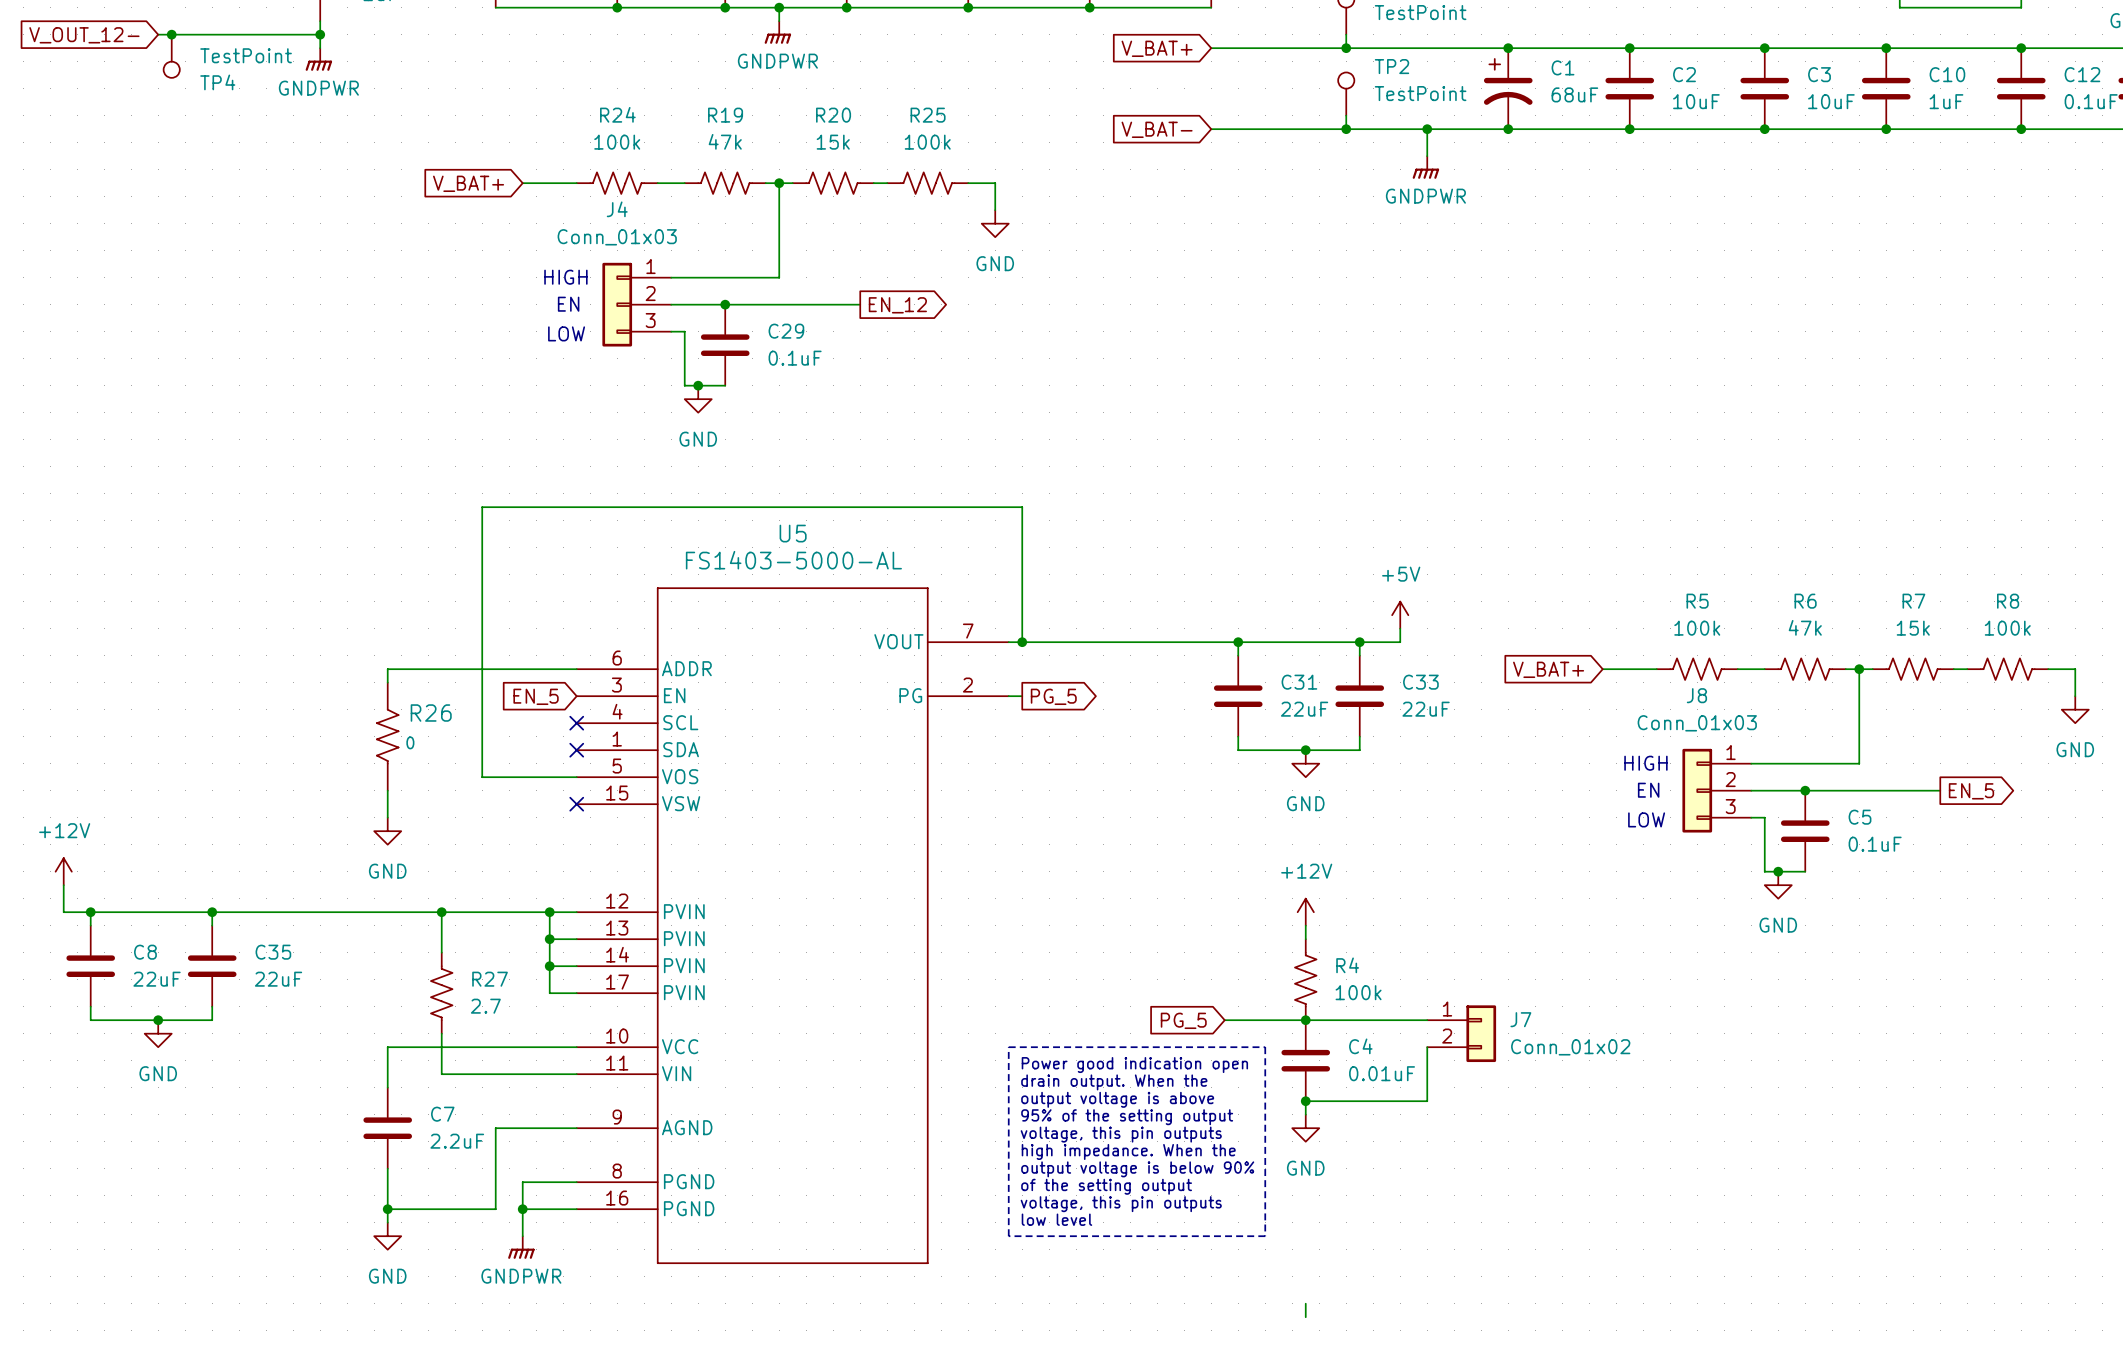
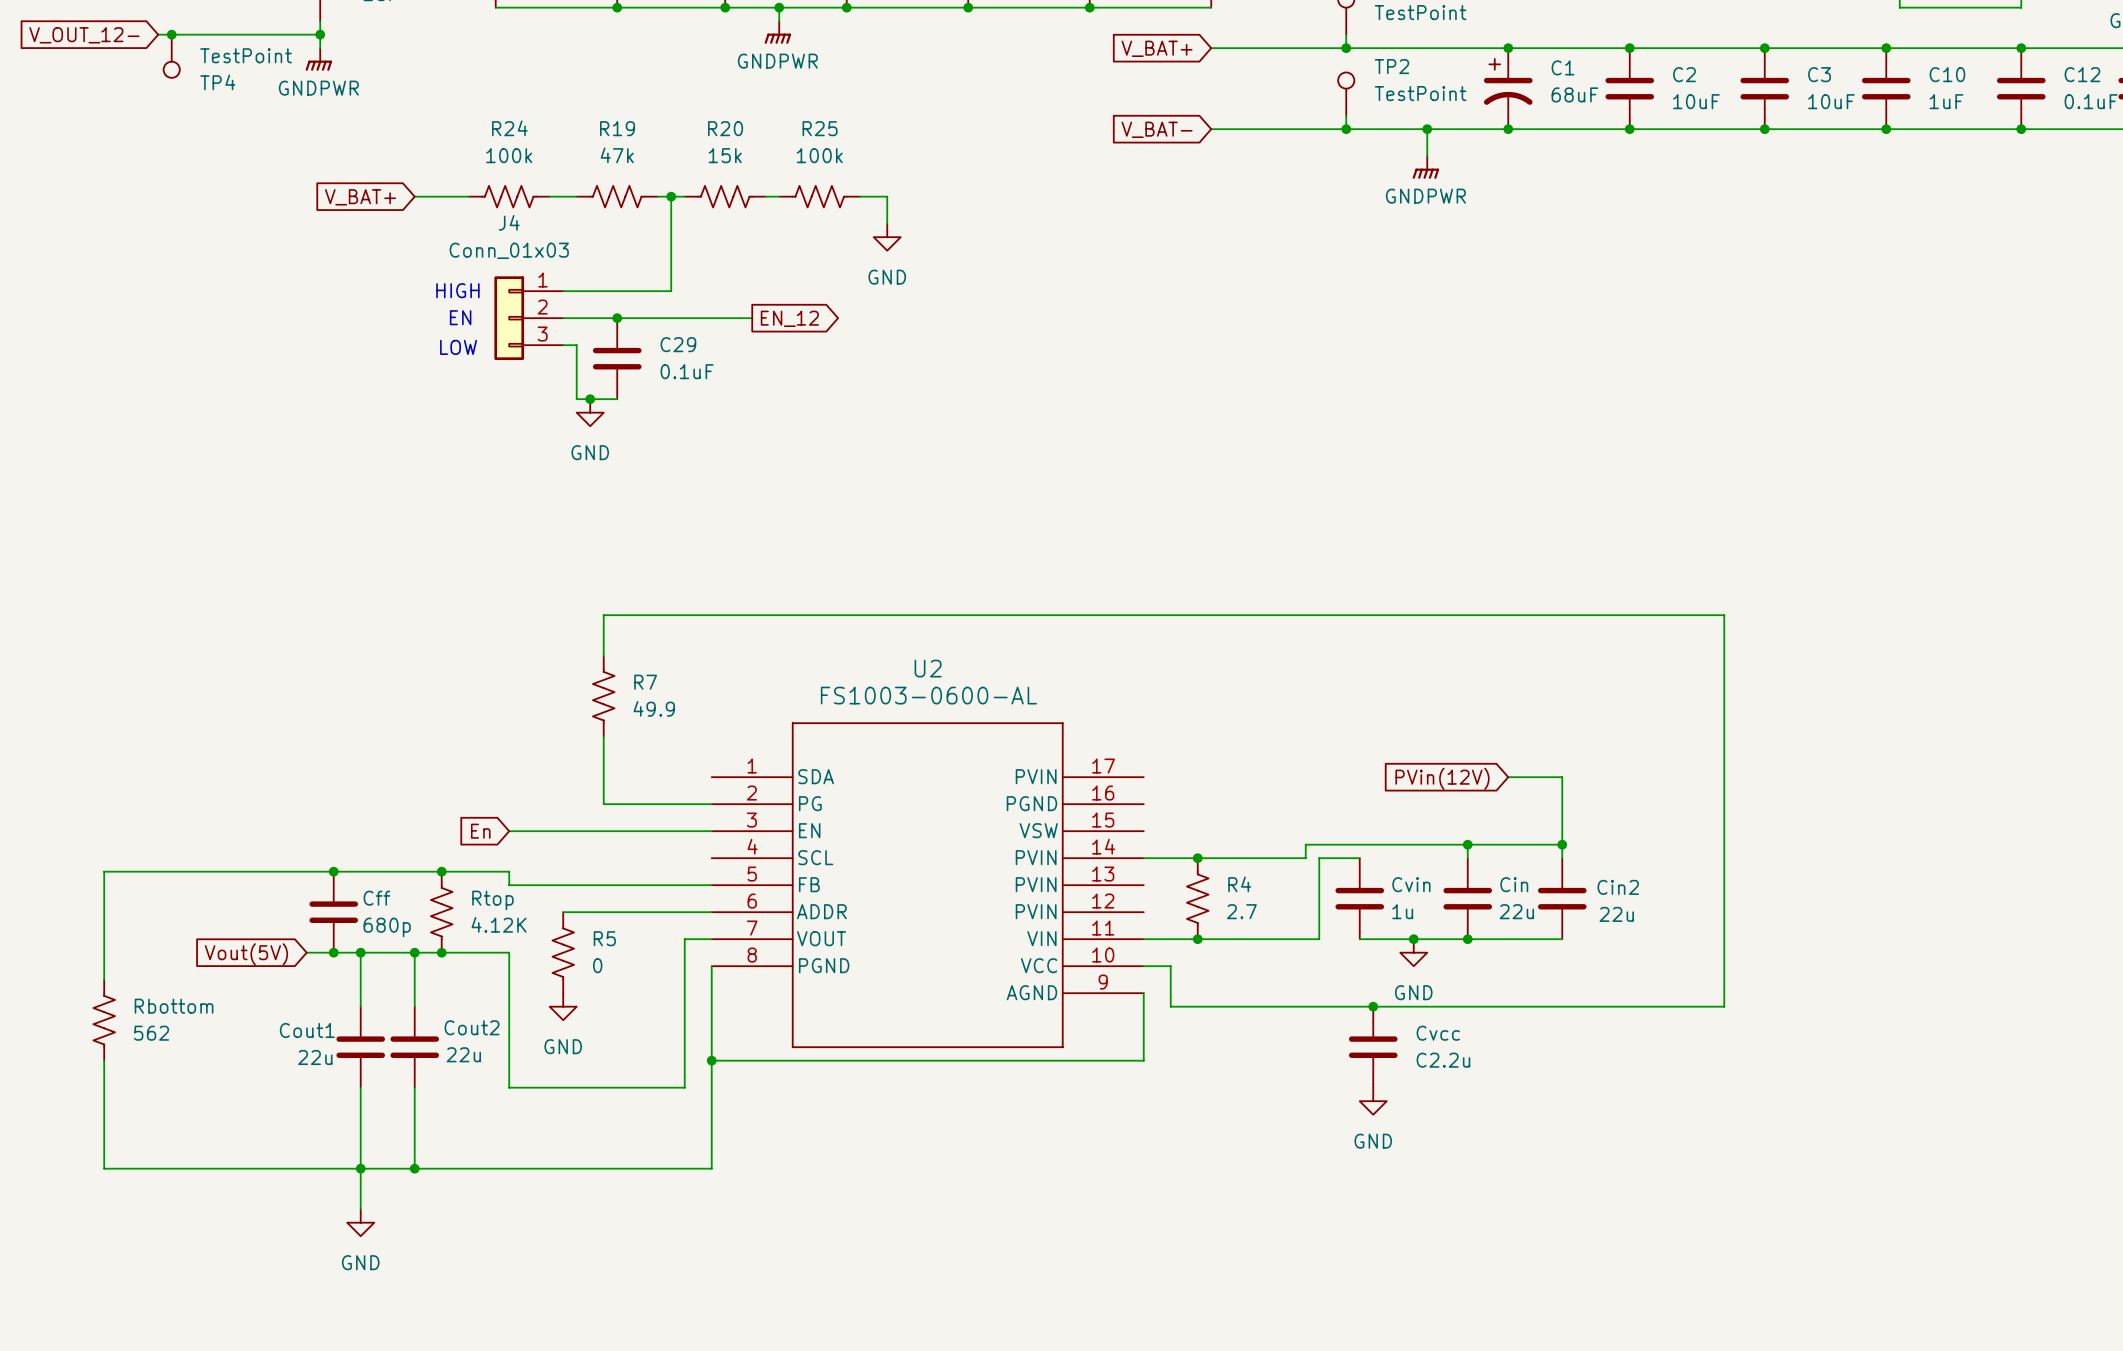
global label position: V_BAT+ (468, 183) -> V_BAT+ (360, 197)
wire: (522, 183) (576, 183) -> (414, 196) (468, 196)
R24 position: (617, 183) -> (509, 196)
wire: (657, 183) (684, 183) -> (549, 196) (576, 196)
R19 position: (725, 183) -> (617, 196)
wire: (765, 183) (792, 183) -> (657, 196) (684, 196)
wire: (779, 183) (779, 277) (671, 277) -> (671, 196) (671, 291) (563, 291)
junction: (779, 183) -> none
R20 position: (833, 183) -> (725, 196)
wire: (873, 183) (887, 183) -> (765, 196) (779, 196)
R25 position: (927, 183) -> (819, 196)
wire: (968, 183) (995, 183) (995, 210) -> (860, 196) (887, 196) (887, 223)
junction: none -> (671, 196)
power symbol position: GND (995, 223) -> GND (887, 237)
text position: HIGH (565, 277) -> HIGH (457, 290)
text position: EN (568, 304) -> EN (460, 317)
J4 position: (636, 304) -> (528, 318)
wire: (671, 304) (860, 304) -> (563, 318) (752, 318)
junction: (725, 304) -> none
global label position: EN_12 (897, 305) -> EN_12 (789, 318)
junction: none -> (617, 318)
wire: (671, 331) (684, 331) (684, 385) (725, 385) -> (563, 345) (576, 345) (576, 399) (617, 399)
text position: LOW (566, 333) -> LOW (458, 347)
C29 position: (725, 345) -> (617, 358)
junction: (698, 385) -> none
junction: none -> (590, 399)
power symbol position: GND (698, 399) -> GND (590, 412)
R5 name position: R5 (1697, 601) -> R5 (604, 938)
R7 name position: R7 (1913, 601) -> R7 (645, 682)
power symbol: +5V (1400, 615) -> none
wire: (1400, 628) (1400, 642) (1008, 642) -> none
R5 value: 100k (1697, 628) -> 0 (597, 965)
R7 value: 15k (1913, 628) -> 49.9 (654, 708)
wire: (1022, 642) (1022, 507) (482, 507) (482, 777) (576, 777) -> none
junction: (1022, 642) -> none
wire: (1238, 642) (1238, 655) -> none
junction: (1238, 642) -> none
wire: (1359, 642) (1359, 655) -> none
junction: (1359, 642) -> none
wire: none -> (603, 655) (603, 615) (1724, 615) (1724, 1006) (1170, 1006) (1170, 966) (1143, 966)
wire: (576, 669) (387, 669) (387, 682) -> none
global label: V_BAT+ (1548, 669) -> none
wire: (1602, 669) (1656, 669) -> none
R5 rotation: 0° (1697, 669) -> 90° clockwise (563, 952)
R5 position: (1697, 669) -> (563, 952)
wire: (1737, 669) (1764, 669) -> none
R6: 47k (1805, 669) -> none
wire: (1845, 669) (1872, 669) -> none
wire: (1859, 669) (1859, 763) (1751, 763) -> none
junction: (1859, 669) -> none
R7 rotation: 0° (1913, 669) -> 90° clockwise (603, 696)
R7 position: (1913, 669) -> (603, 696)
wire: (1953, 669) (1967, 669) -> none
R8: 100k (2007, 669) -> none
wire: (2048, 669) (2075, 669) (2075, 696) -> none
global label: EN_5 (536, 696) -> none
wire: (1008, 696) (1022, 696) -> none
global label: PG_5 (1053, 696) -> none
C31: 22uF (1238, 696) -> none
C33: 22uF (1359, 696) -> none
power symbol: GND (2075, 709) -> none
no-connect mark: (576, 723) -> none
R26: 0 (387, 736) -> none
wire: none -> (603, 736) (603, 804) (711, 804)
wire: (1238, 736) (1238, 750) (1359, 750) (1359, 736) -> none
no-connect mark: (576, 750) -> none
junction: (1305, 750) -> none
power symbol: GND (1305, 763) -> none
text: HIGH (1645, 763) -> none
wire: none -> (1508, 777) (1562, 777) (1562, 858)
global label: none -> PVin(12V) (1442, 778)
wire: (387, 790) (387, 817) -> none
text: EN (1648, 790) -> none
J8: Conn_01x03 (1716, 790) -> none
wire: (1751, 790) (1940, 790) -> none
junction: (1805, 790) -> none
global label: EN_5 (1971, 791) -> none
no-connect mark: (576, 804) -> none
wire: (1751, 817) (1764, 817) (1764, 871) (1805, 871) -> none
text: LOW (1646, 819) -> none
power symbol: GND (387, 831) -> none
global label: none -> En (480, 831)
wire: none -> (509, 831) (711, 831)
C5: 0.1uF (1805, 831) -> none
junction: none -> (1467, 844)
wire: none -> (1562, 844) (1305, 844) (1305, 858) (1143, 858)
junction: none -> (1562, 844)
junction: none -> (1197, 858)
wire: none -> (1359, 858) (1319, 858) (1319, 939) (1143, 939)
power symbol: +12V (63, 871) -> none
junction: none -> (333, 871)
junction: none -> (441, 871)
junction: (1778, 871) -> none
wire: (63, 885) (63, 912) (563, 912) -> none
wire: none -> (711, 885) (509, 885) (509, 871) (104, 871) (104, 979)
U2: none -> FS1003-0600-AL (927, 885)
power symbol: GND (1778, 885) -> none
Cvin: none -> 1u (1359, 898)
Cin: none -> 22u (1467, 898)
Cin2: none -> 22u (1562, 898)
wire: (90, 912) (90, 925) -> none
junction: (90, 912) -> none
wire: (212, 912) (212, 925) -> none
junction: (212, 912) -> none
Cff: none -> 680p (333, 912)
junction: (441, 912) -> none
Rtop: none -> 4.12K (441, 912)
wire: (549, 912) (549, 993) (576, 993) -> none
junction: (549, 912) -> none
power symbol: +12V (1305, 912) -> none
U5: FS1403-5000-AL (792, 925) -> none
wire: (1305, 925) (1305, 939) -> (1467, 844) (1467, 858)
wire: (549, 939) (576, 939) -> none
junction: (549, 939) -> none
wire: none -> (711, 939) (684, 939) (684, 1087) (509, 1087) (509, 952) (306, 952)
junction: none -> (1197, 939)
junction: none -> (1413, 939)
junction: none -> (1467, 939)
junction: none -> (333, 952)
junction: none -> (360, 952)
wire: none -> (414, 952) (414, 1006)
junction: none -> (414, 952)
junction: none -> (441, 952)
power symbol: none -> GND (1413, 952)
global label: none -> Vout(5V) (246, 954)
C8: 22uF (90, 966) -> none
C35: 22uF (212, 966) -> none
wire: (549, 966) (576, 966) -> none
junction: (549, 966) -> none
wire: none -> (711, 966) (711, 1168) (104, 1168) (104, 1060)
R4 position: (1305, 979) -> (1197, 898)
R4 value: 100k (1358, 992) -> 2.7 (1241, 911)
R27: 2.7 (441, 993) -> none
wire: none -> (1143, 993) (1143, 1060) (711, 1060)
wire: (90, 1006) (90, 1020) (212, 1020) (212, 1006) -> none
power symbol: none -> GND (563, 1006)
junction: none -> (1373, 1006)
Rbottom: none -> 562 (104, 1020)
junction: (158, 1020) -> none
global label: PG_5 (1183, 1020) -> none
wire: (1224, 1020) (1427, 1020) -> (1359, 939) (1562, 939)
junction: (1305, 1020) -> none
power symbol: GND (158, 1033) -> none
wire: (441, 1033) (441, 1074) (576, 1074) -> none
J7: Conn_01x02 (1461, 1033) -> none
Cout1: none -> 22u (360, 1047)
Cout2: none -> 22u (414, 1047)
wire: (576, 1047) (387, 1047) (387, 1087) -> none
line: (1008, 1047) (1265, 1047) (1265, 1236) (1008, 1236) (1008, 1047) -> none
Cvcc: none -> C2.2u (1373, 1047)
wire: (1427, 1047) (1427, 1101) (1305, 1101) (1305, 1114) -> none
junction: none -> (711, 1060)
C4: 0.01uF (1305, 1060) -> none
text: Power good indication open (1134, 1065) -> none
text: drain output. When the (1114, 1082) -> none
wire: none -> (360, 1087) (360, 1209)
wire: none -> (414, 1087) (414, 1168)
text: output voltage is above (1117, 1099) -> none
junction: (1305, 1101) -> none
text: 95% of the setting output (1127, 1117) -> none
C7: 2.2uF (387, 1128) -> none
wire: (576, 1128) (495, 1128) (495, 1209) (387, 1209) -> none
power symbol position: GND (1305, 1128) -> GND (1373, 1101)
text: voltage, this pin outputs (1121, 1134) -> none
text: high impedance. When the (1128, 1151) -> none
junction: none -> (360, 1168)
wire: (387, 1168) (387, 1222) -> (360, 952) (360, 1006)
junction: none -> (414, 1168)
text: output voltage is below 90% (1137, 1169) -> none
wire: (576, 1182) (522, 1182) (522, 1236) -> none
text: of the setting output (1106, 1186) -> none
text: voltage, this pin outputs (1121, 1204) -> none
junction: (387, 1209) -> none
wire: (522, 1209) (576, 1209) -> none
junction: (522, 1209) -> none
text: low level (1056, 1219) -> none
power symbol position: GND (387, 1236) -> GND (360, 1222)
power symbol: GNDPWR (521, 1247) -> none
wire: (1305, 1303) (1305, 1317) -> none

